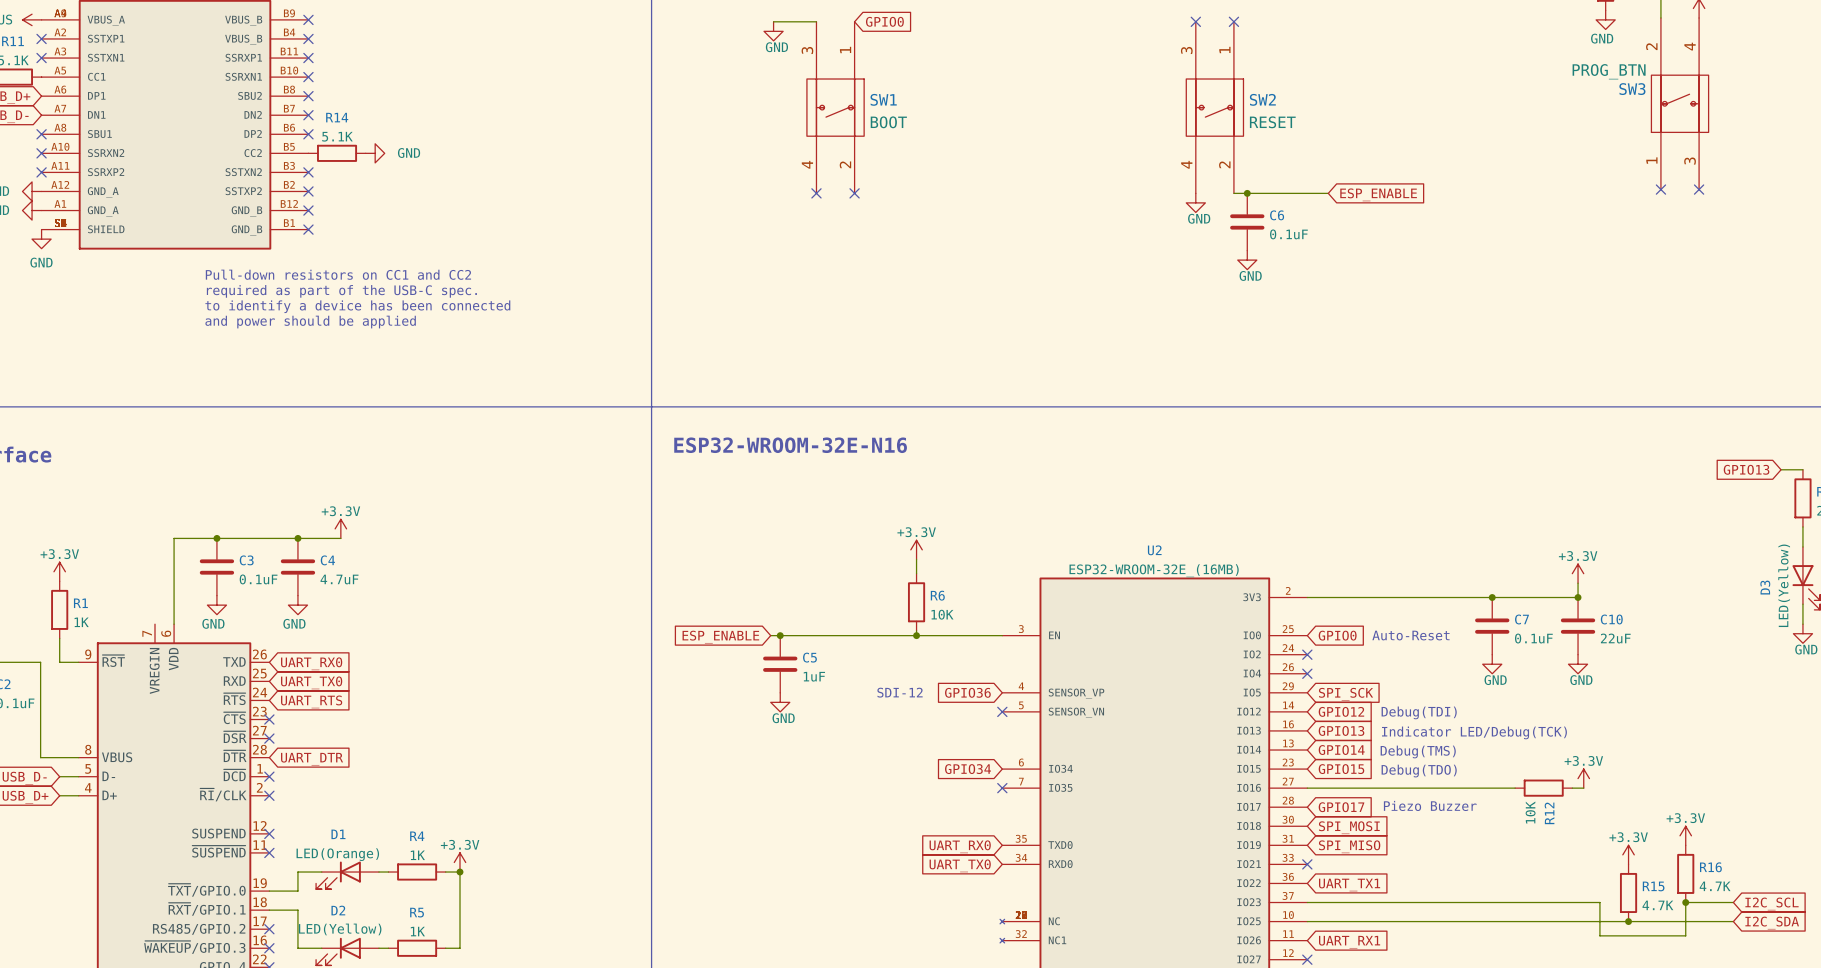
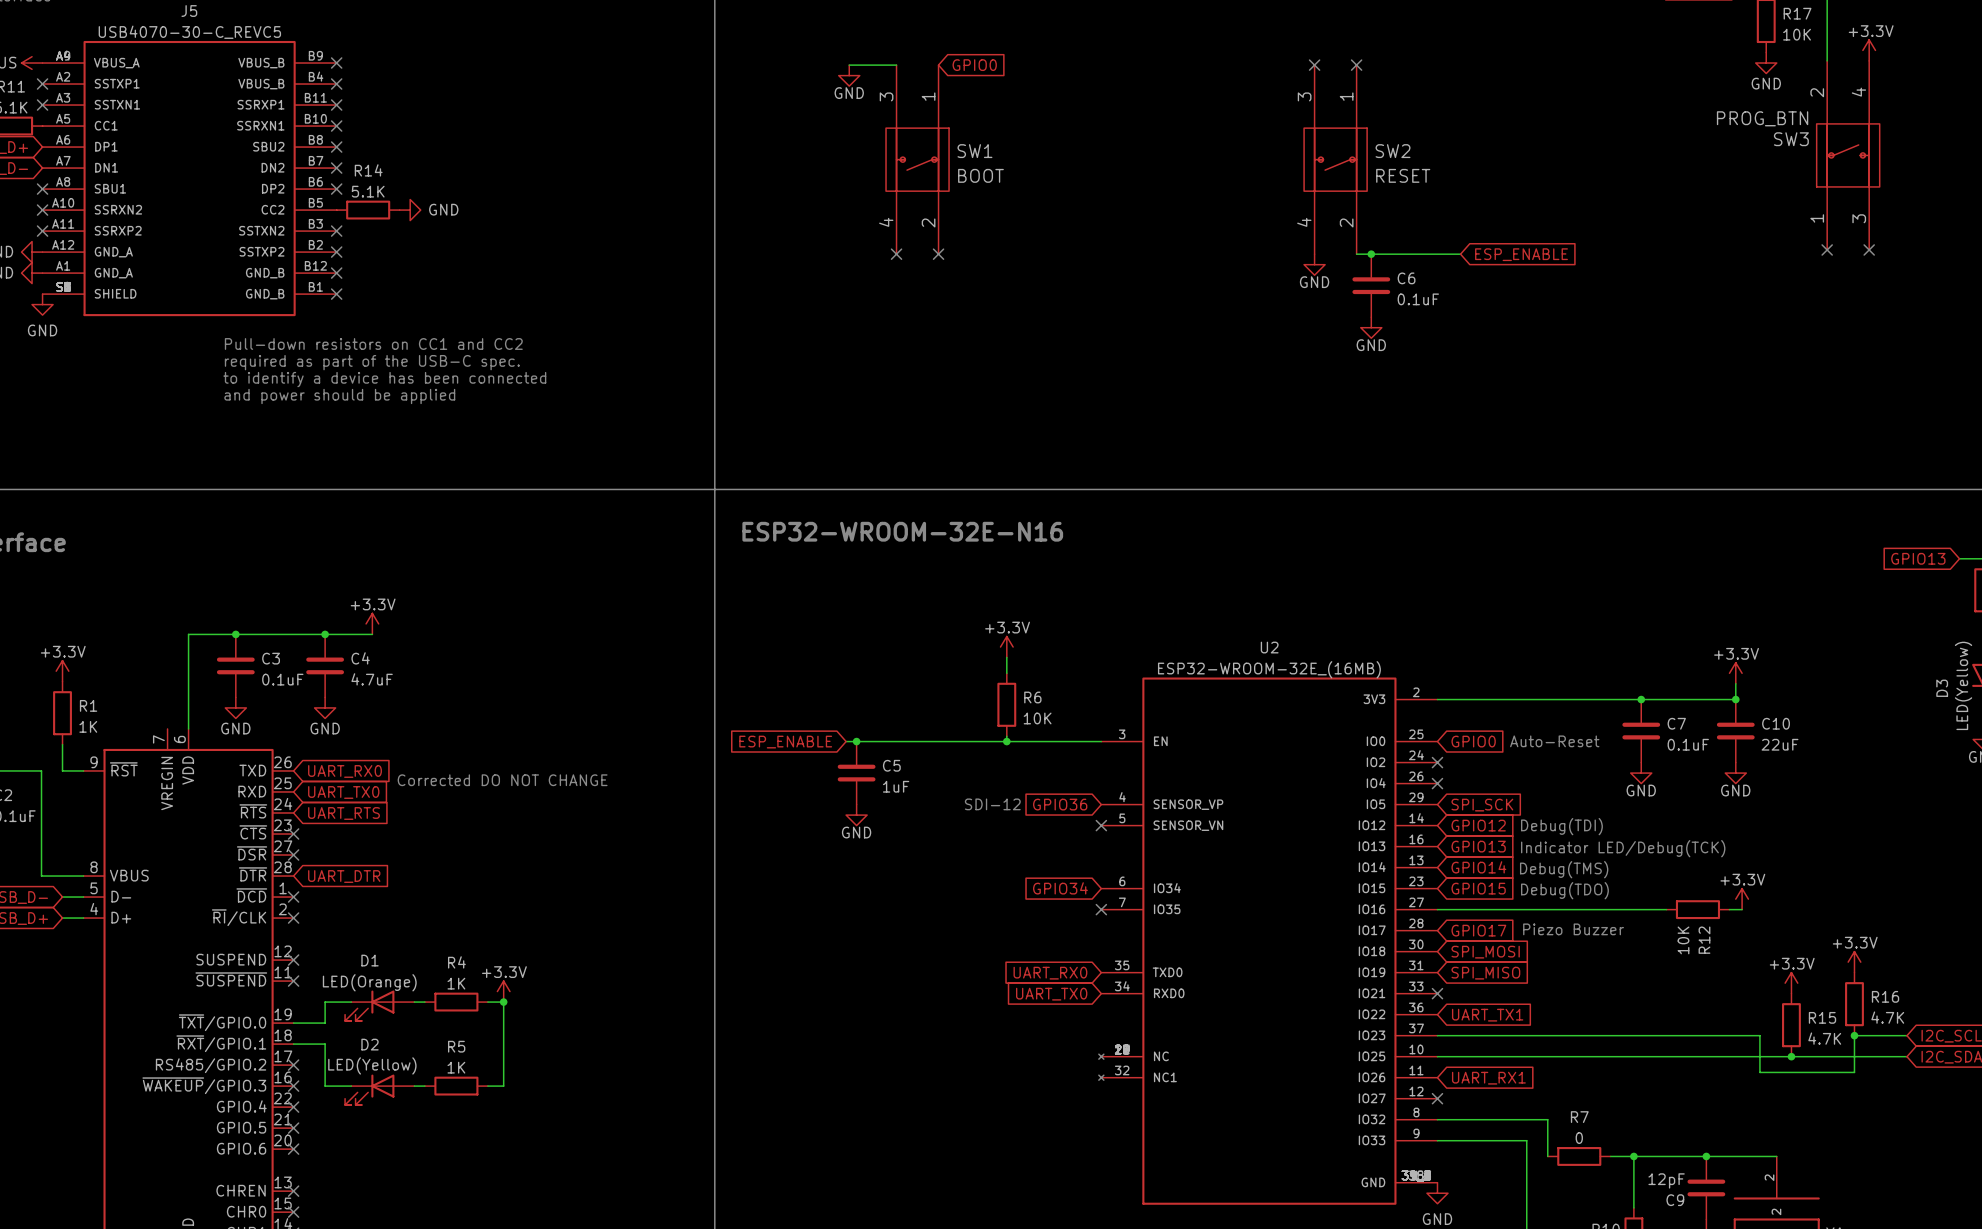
text: none -> Corrected DO NOT CHANGE (502, 780)

